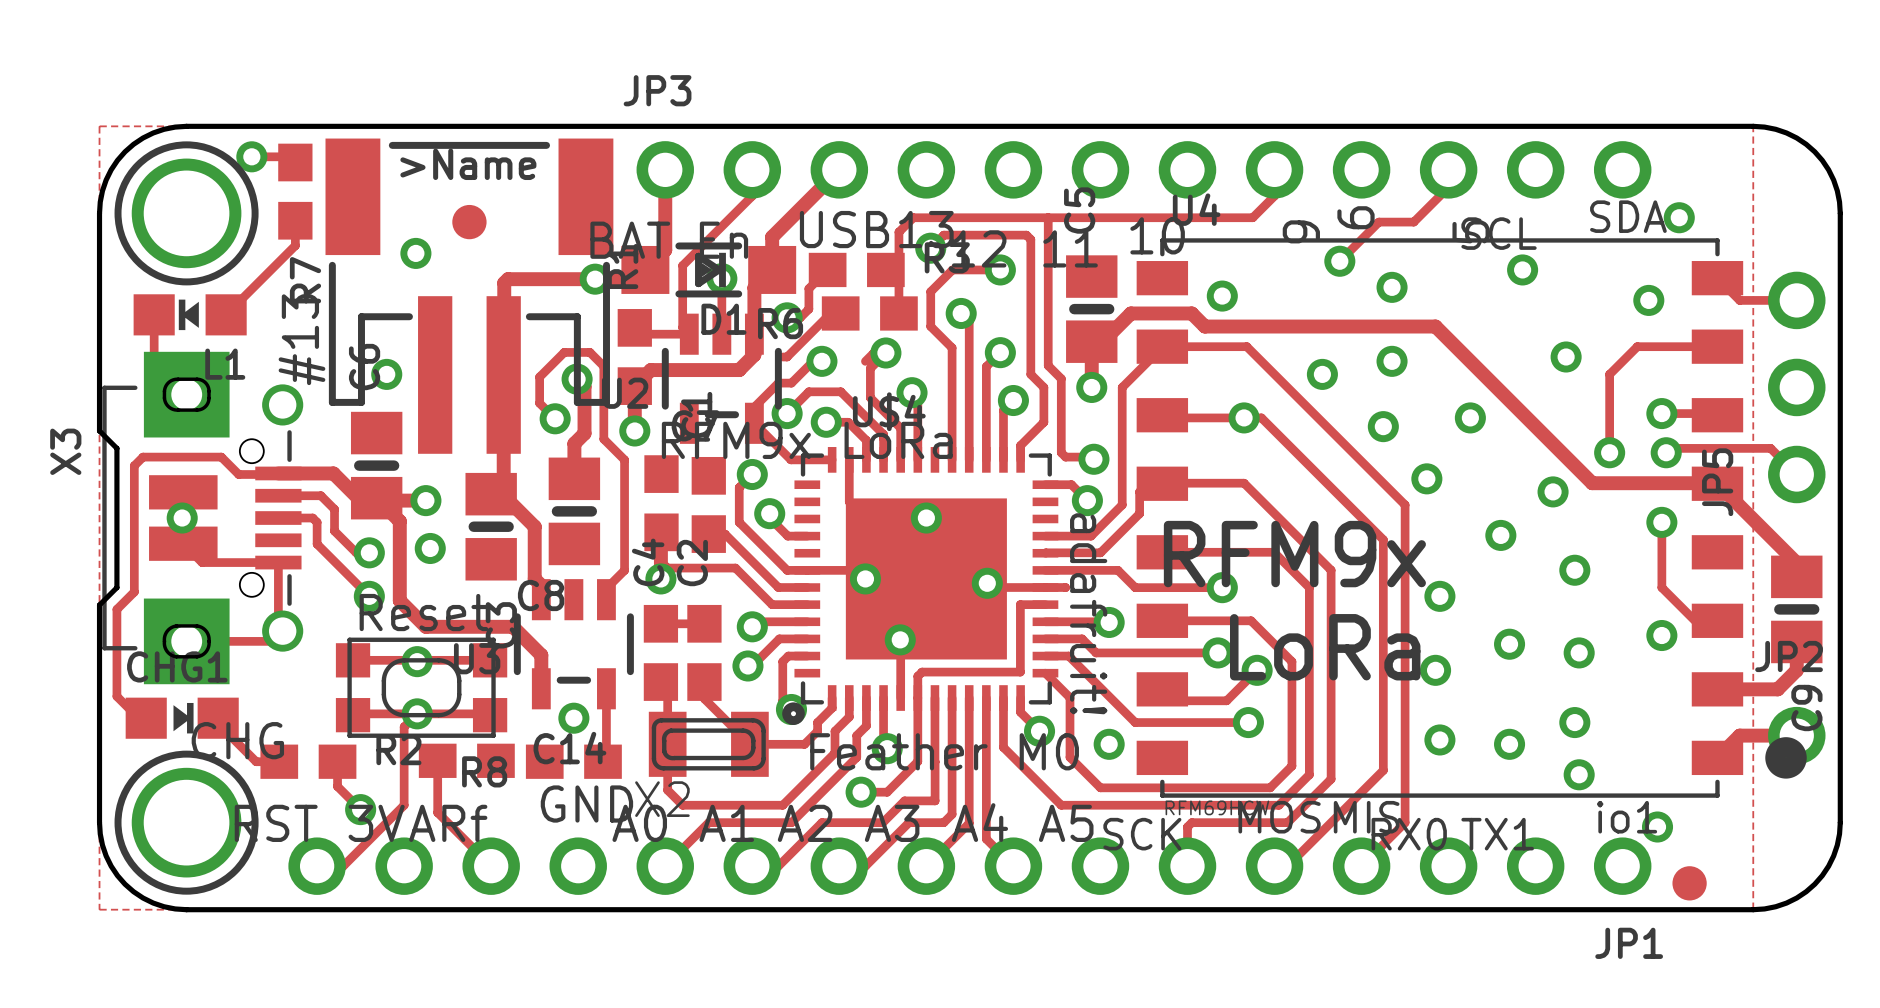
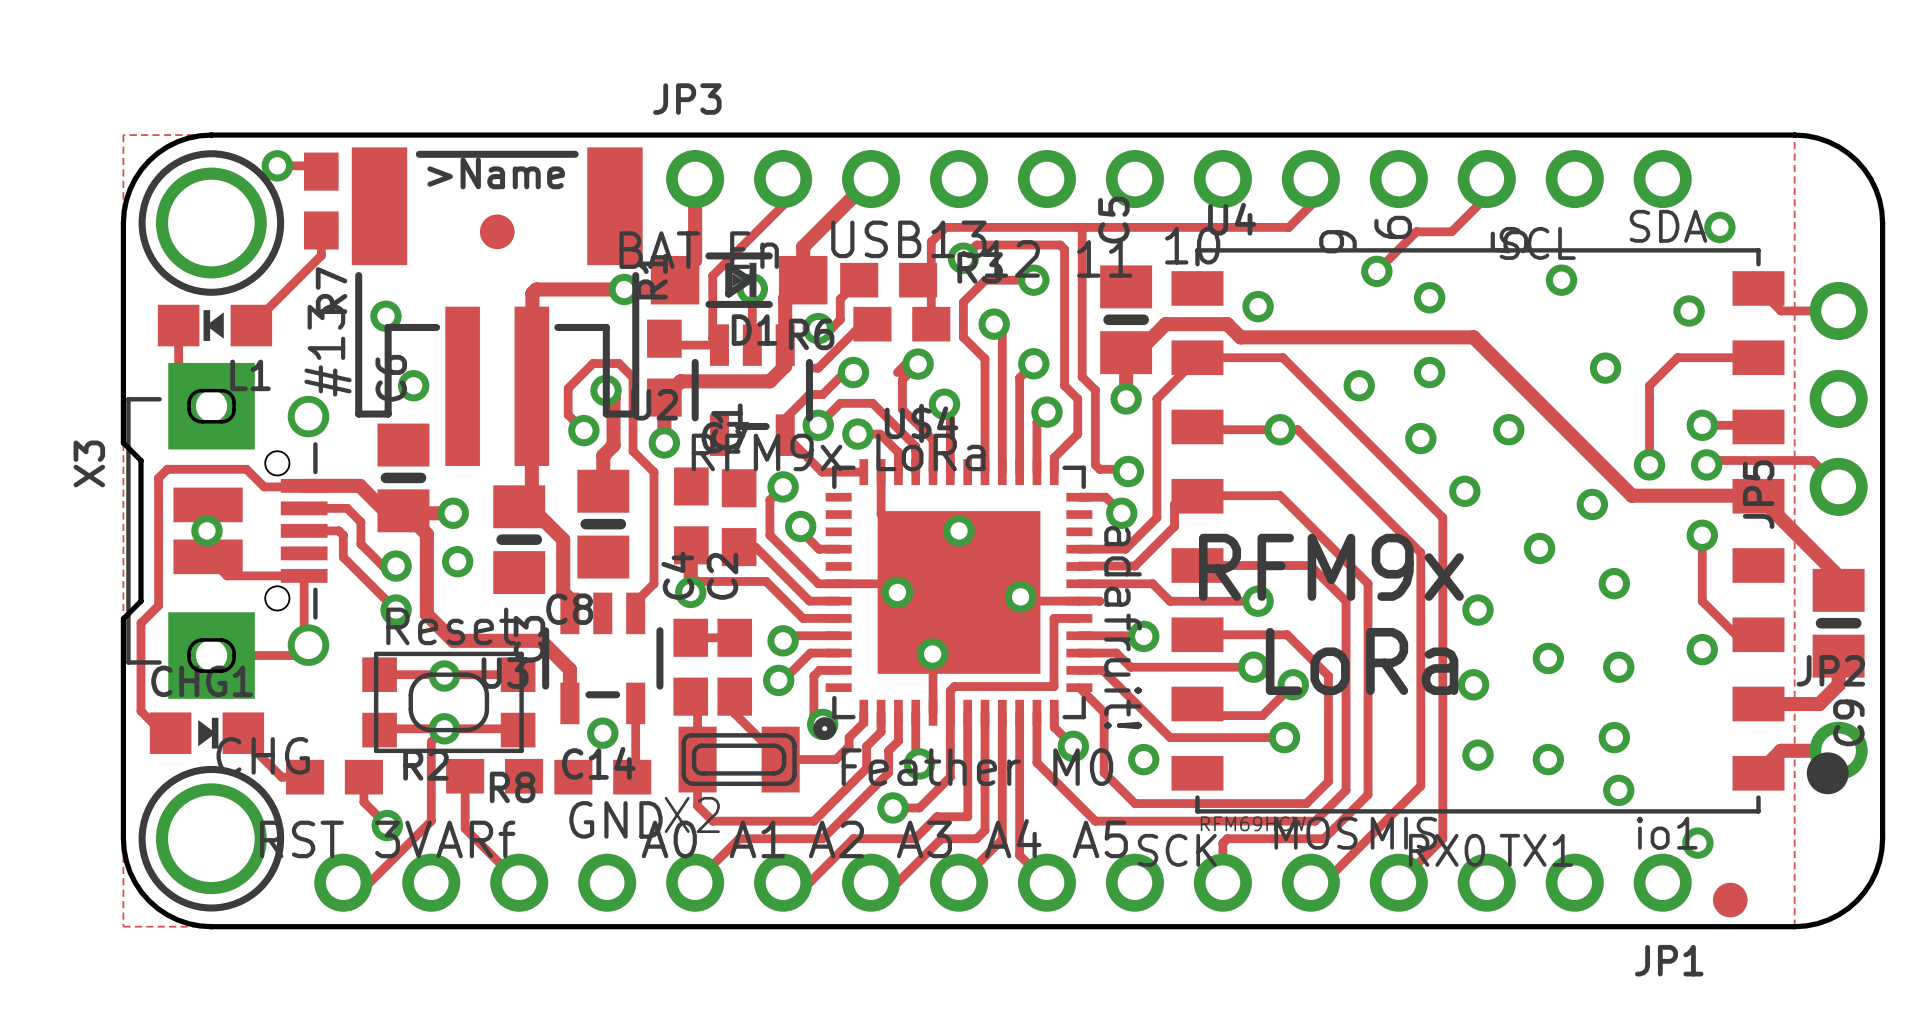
via position: (415, 253) -> (385, 316)

